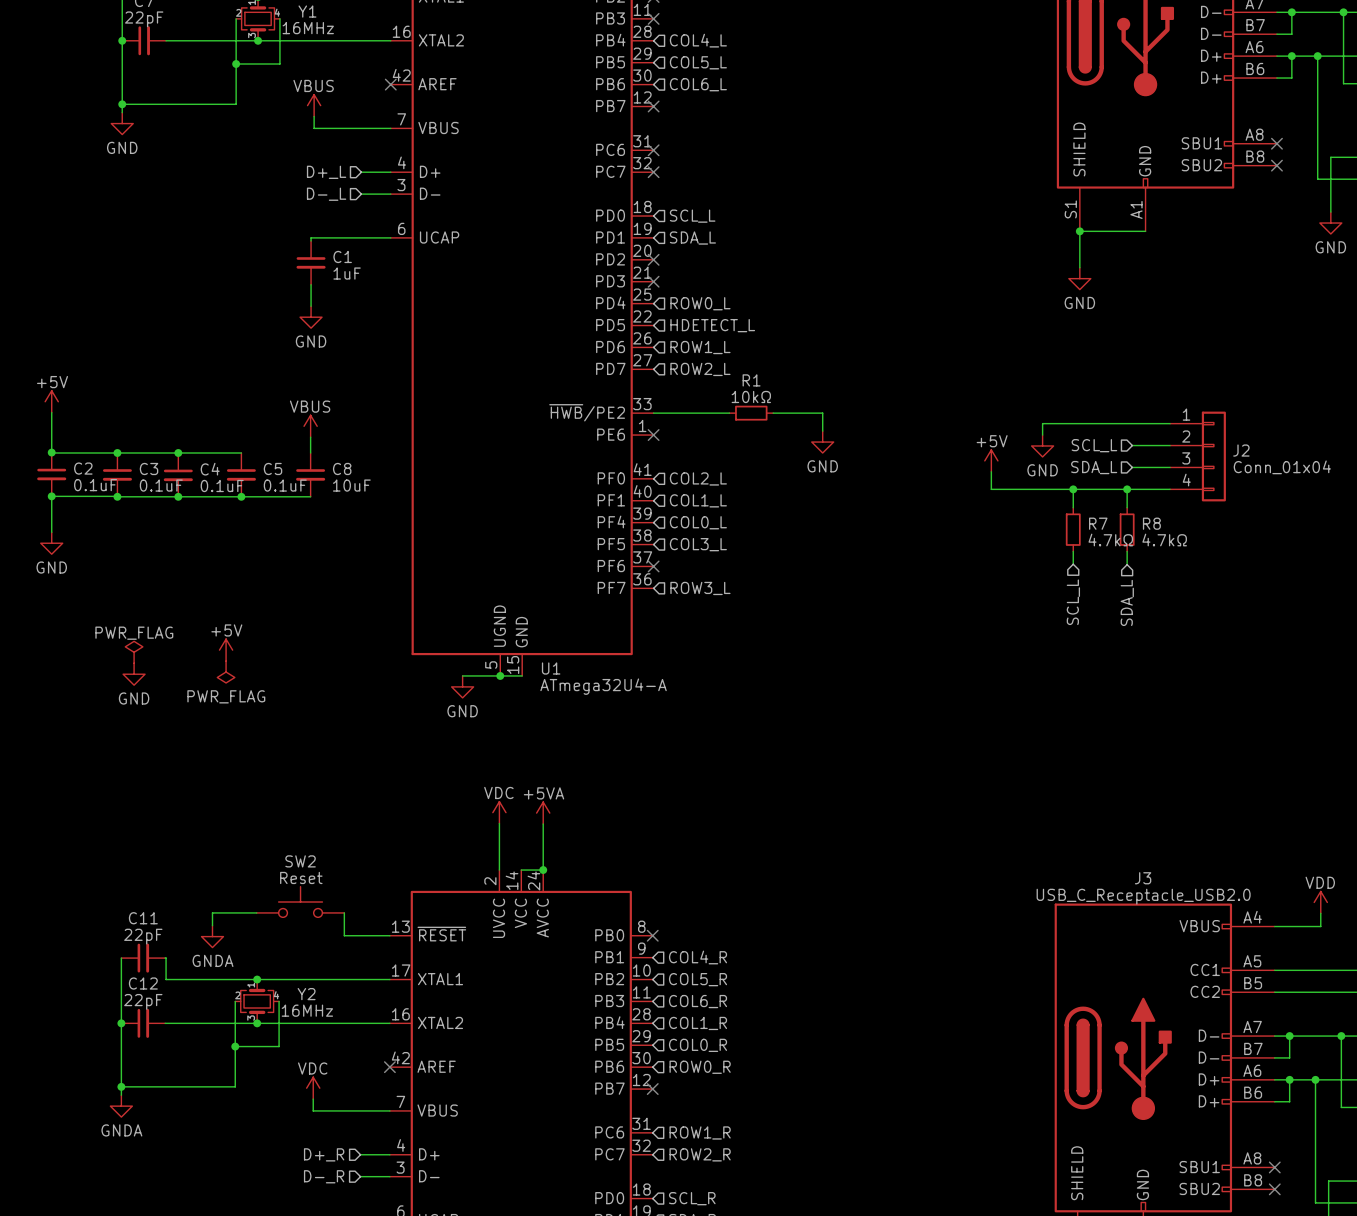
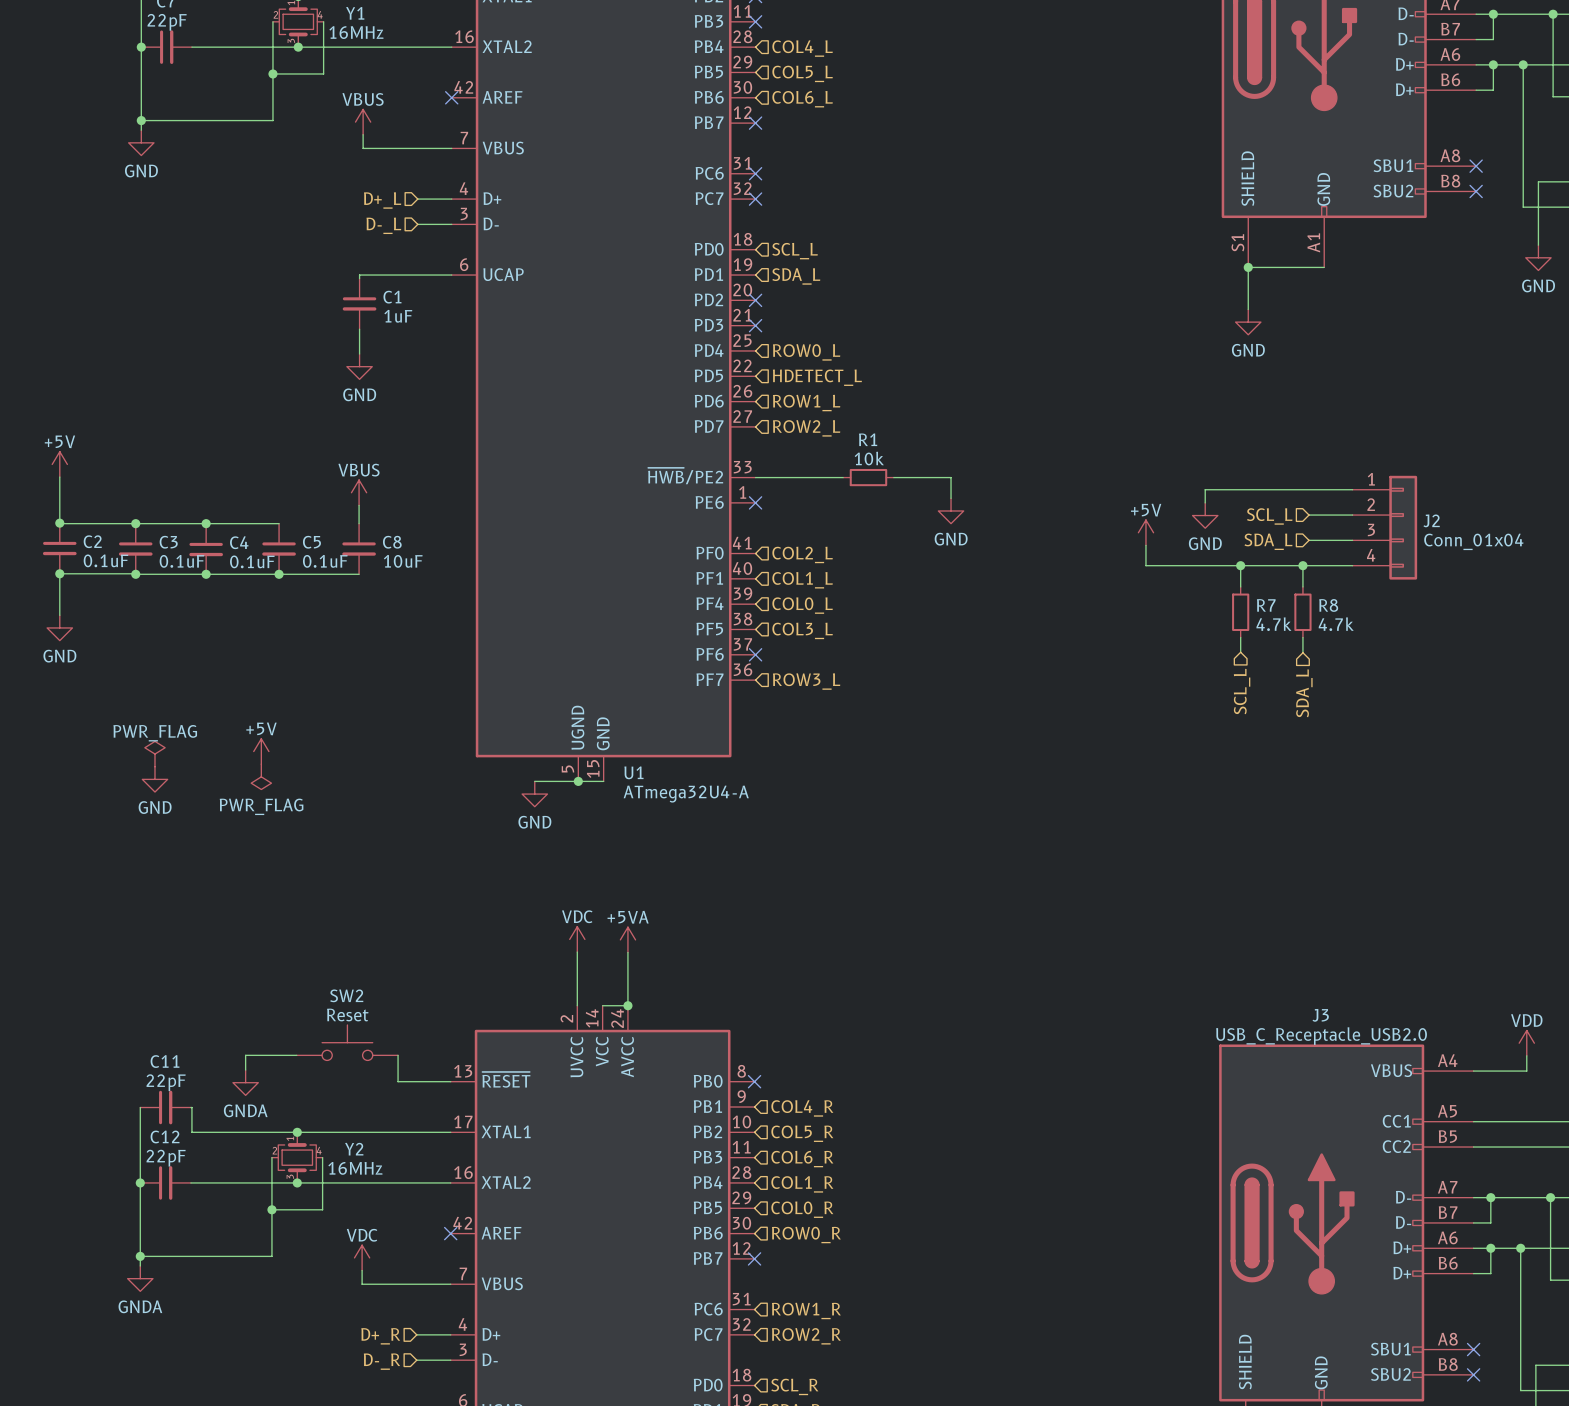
R1 value: 10kΩ (751, 396) -> 10k (869, 458)
R7 value: 4.7kΩ (1110, 540) -> 4.7k (1273, 624)
R8 value: 4.7kΩ (1164, 540) -> 4.7k (1336, 624)

